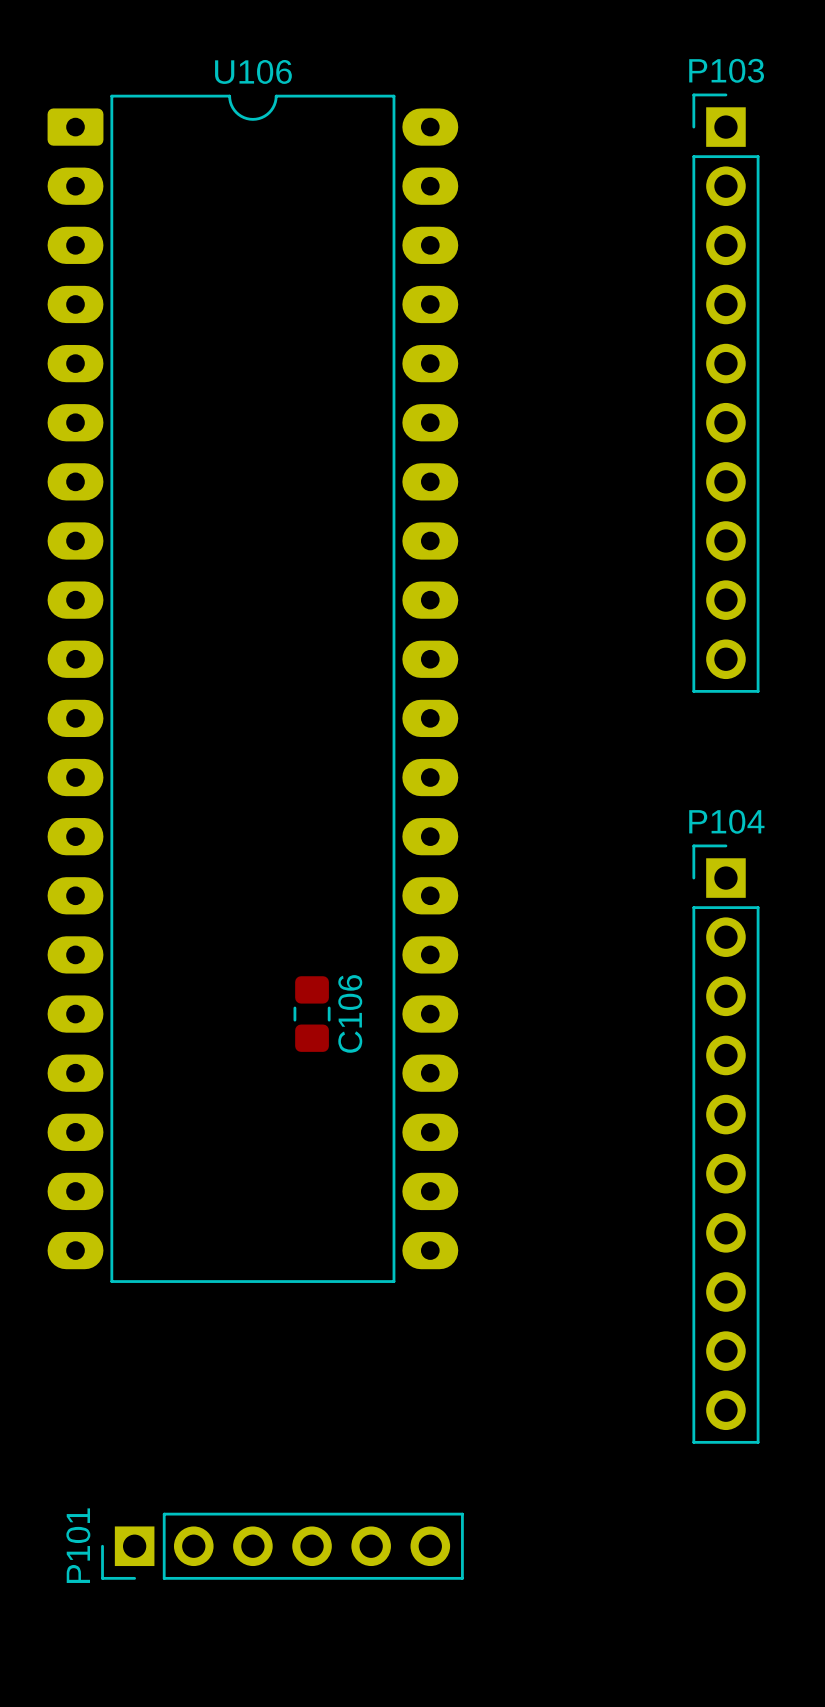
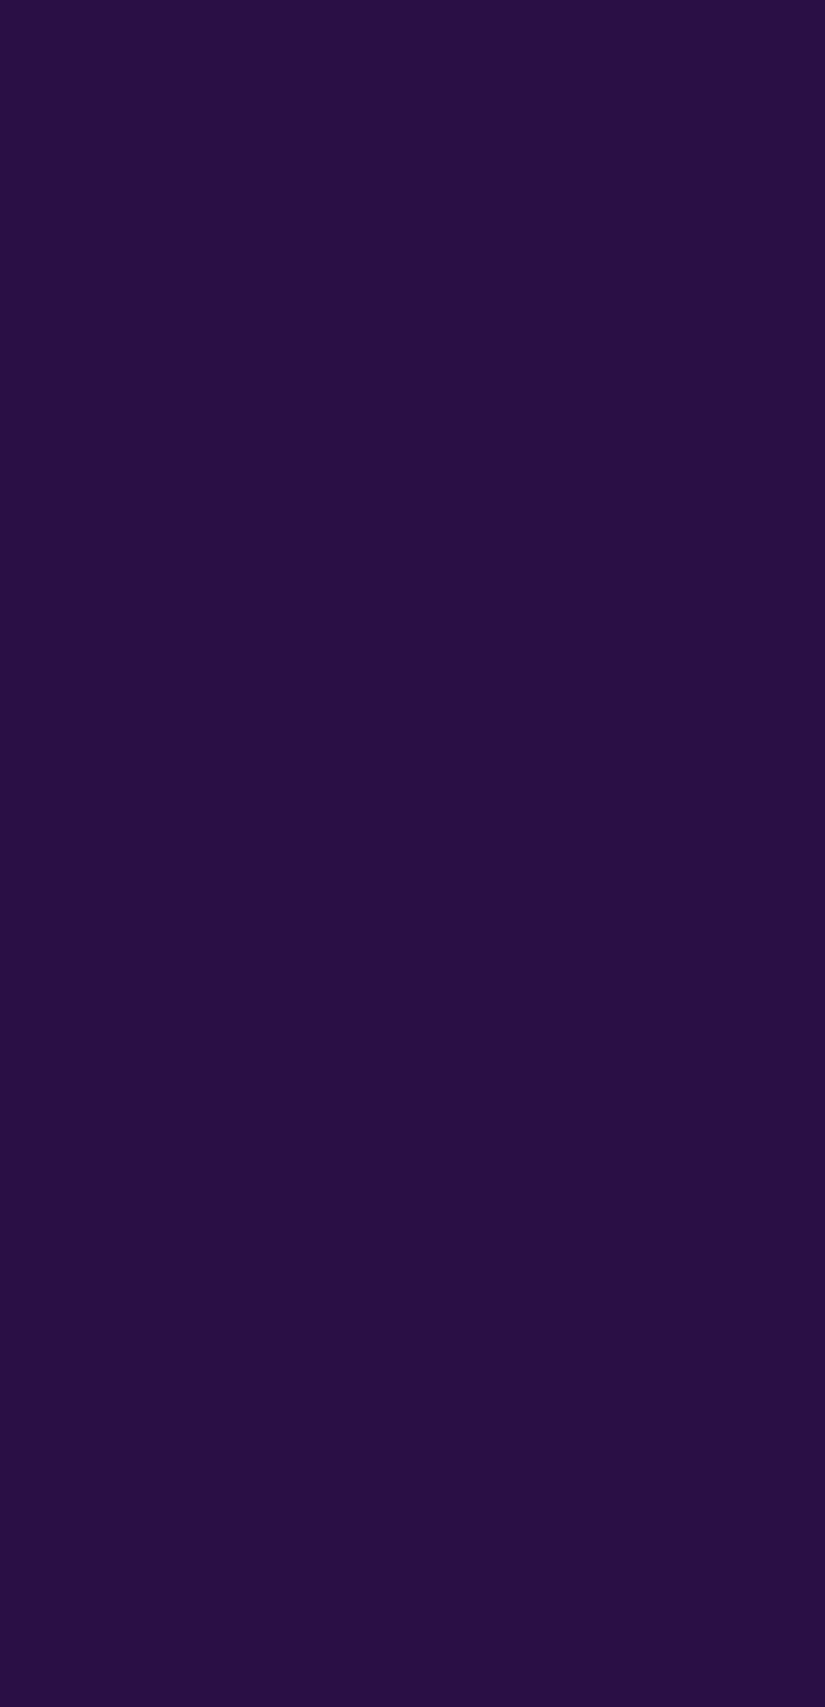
P103: (725, 393) -> none
U106: (252, 688) -> none
C106: (312, 1014) -> none
P104: (725, 1144) -> none
P101: (282, 1546) -> none

